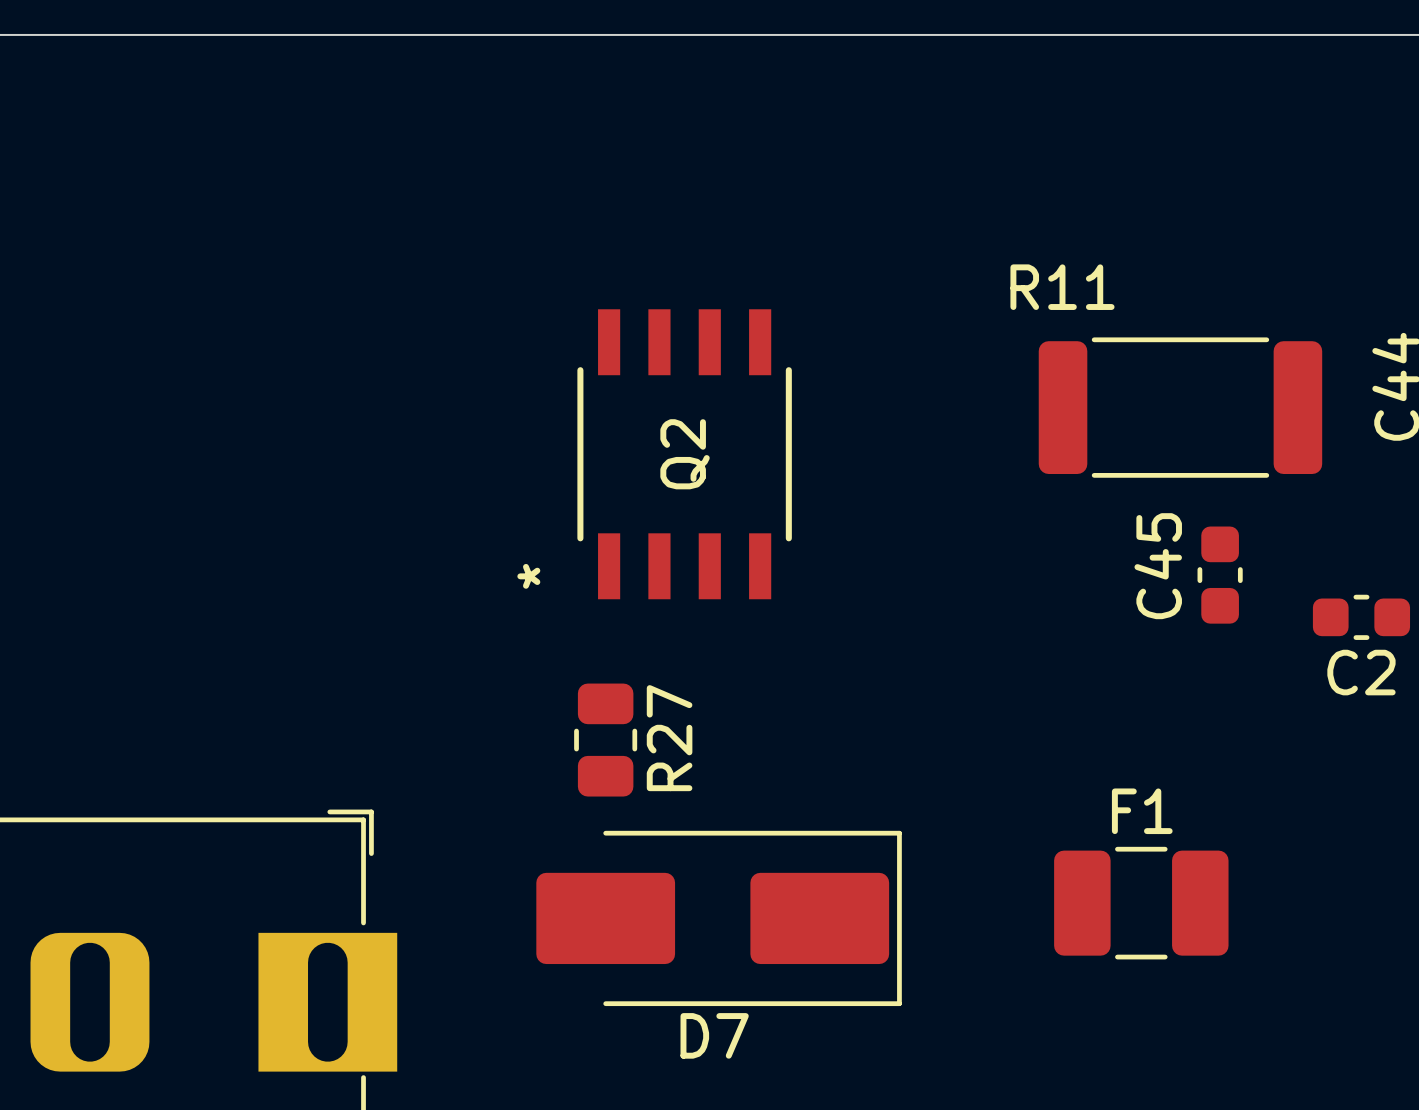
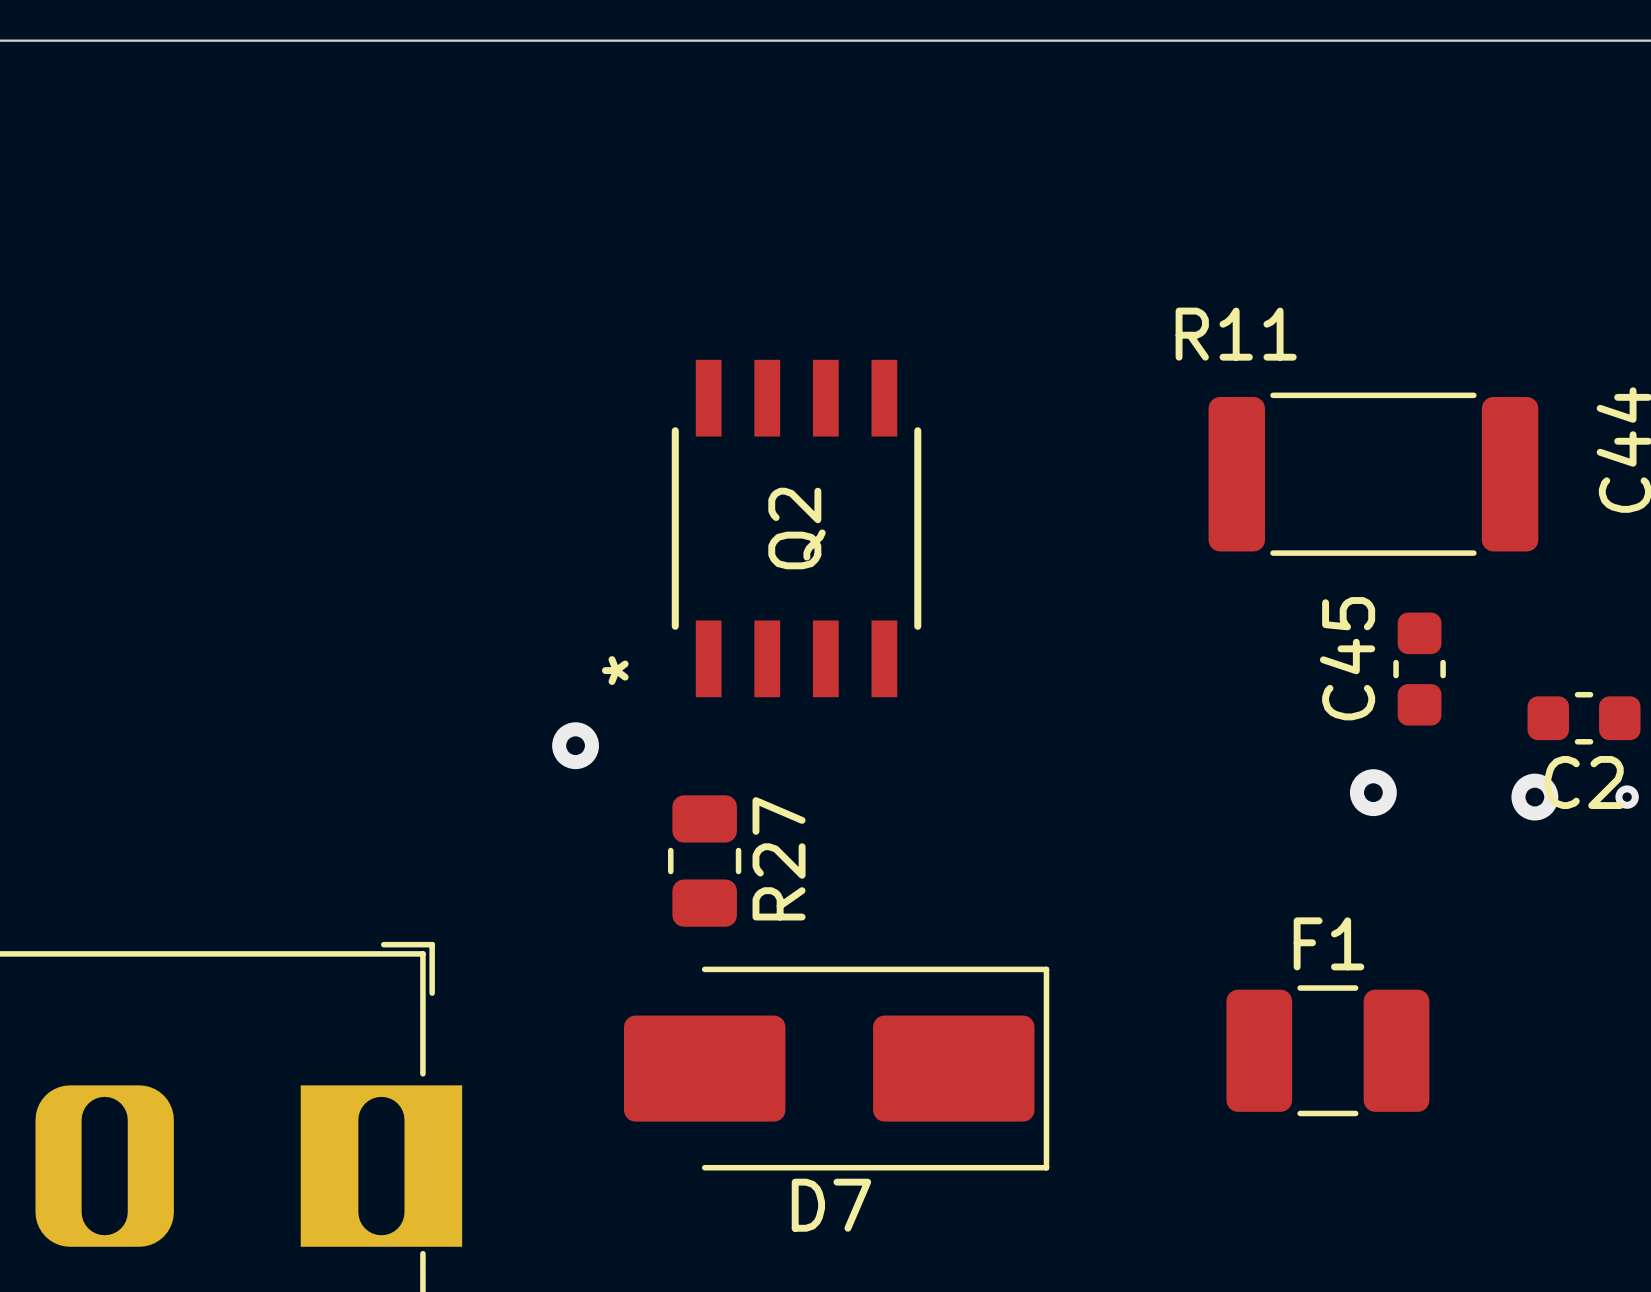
via: none -> (575, 745)
via: none -> (1373, 792)
via: none -> (1534, 797)
via: none -> (1627, 797)

